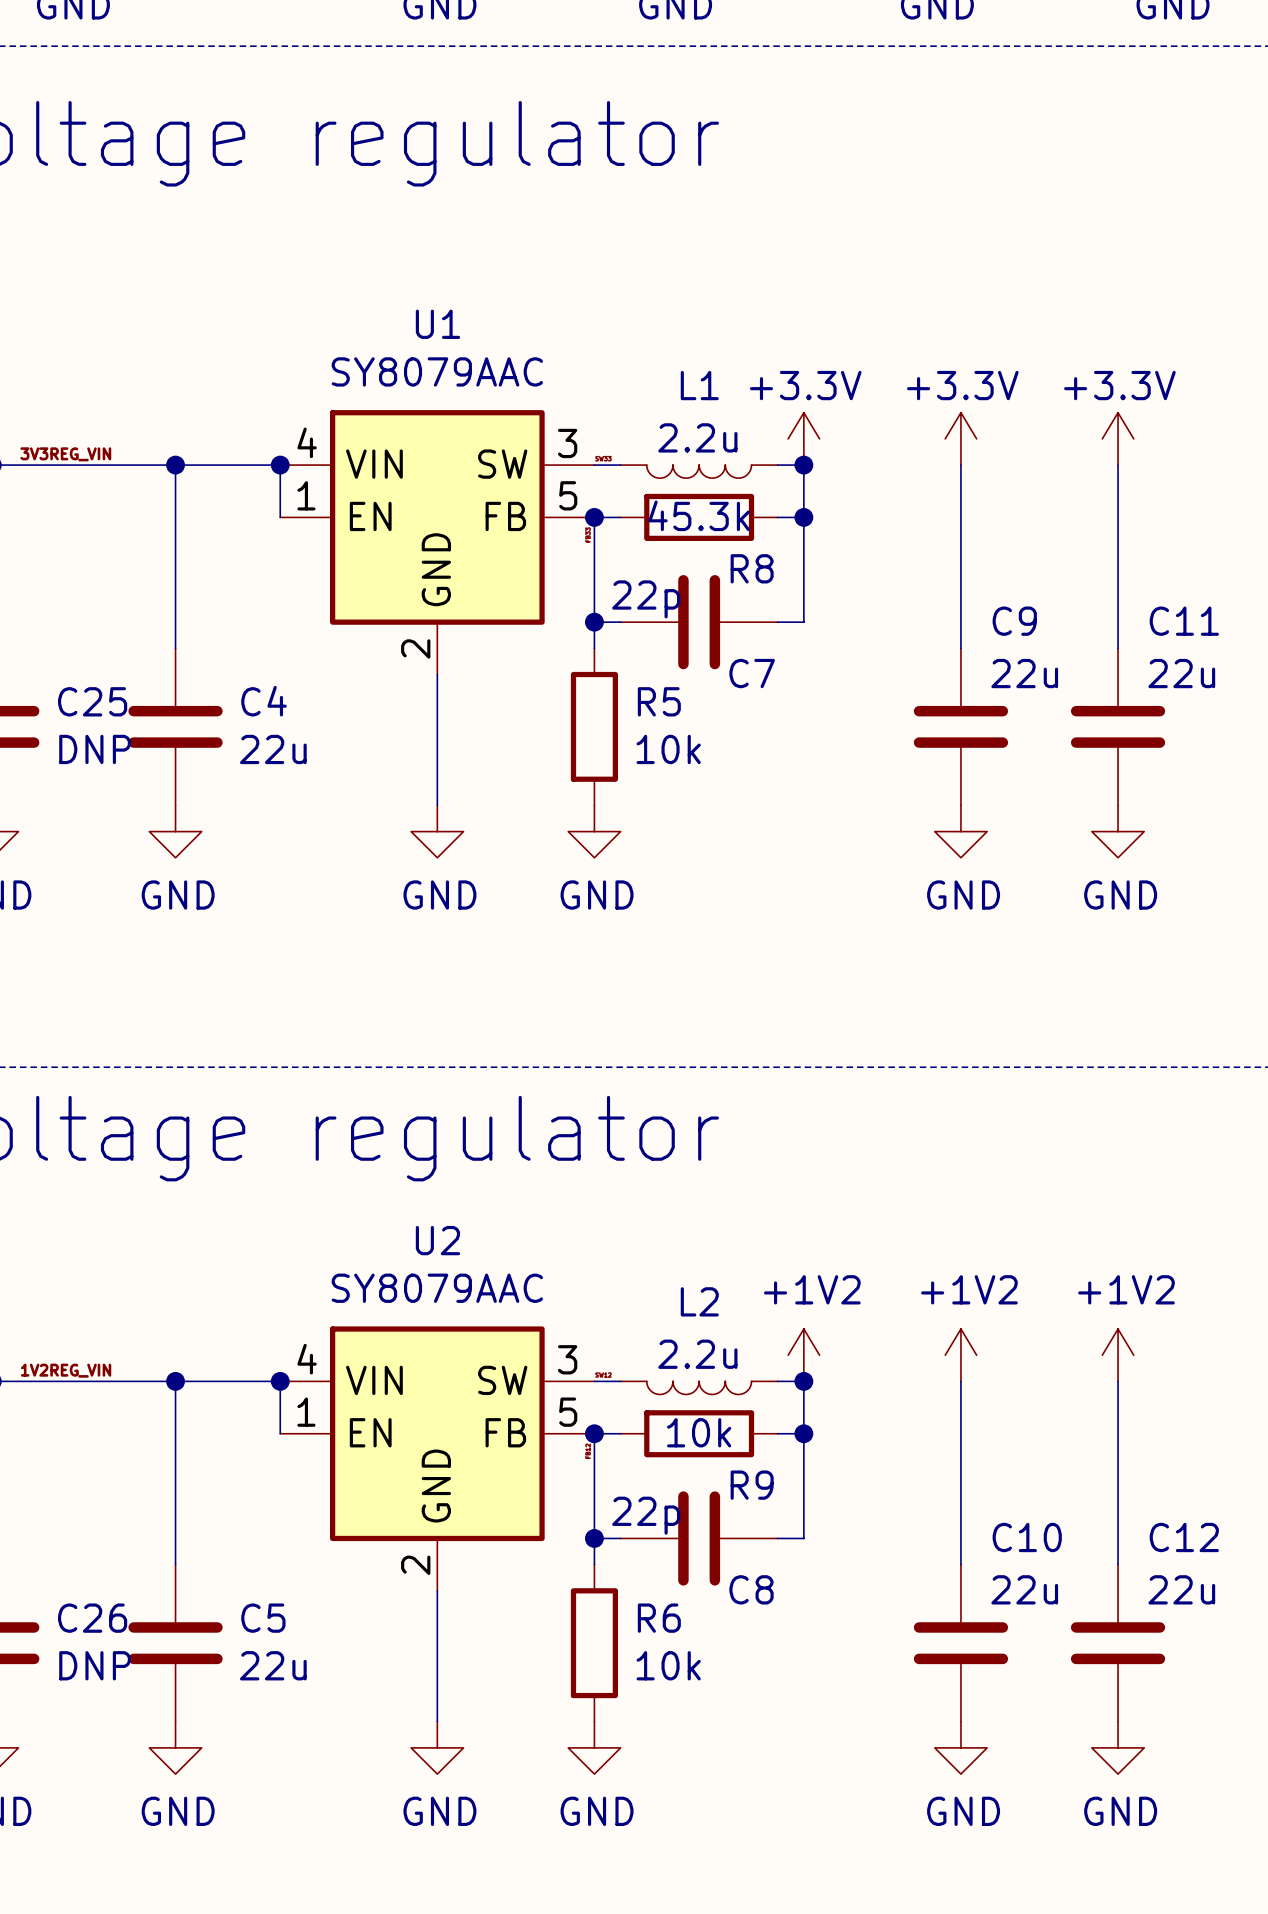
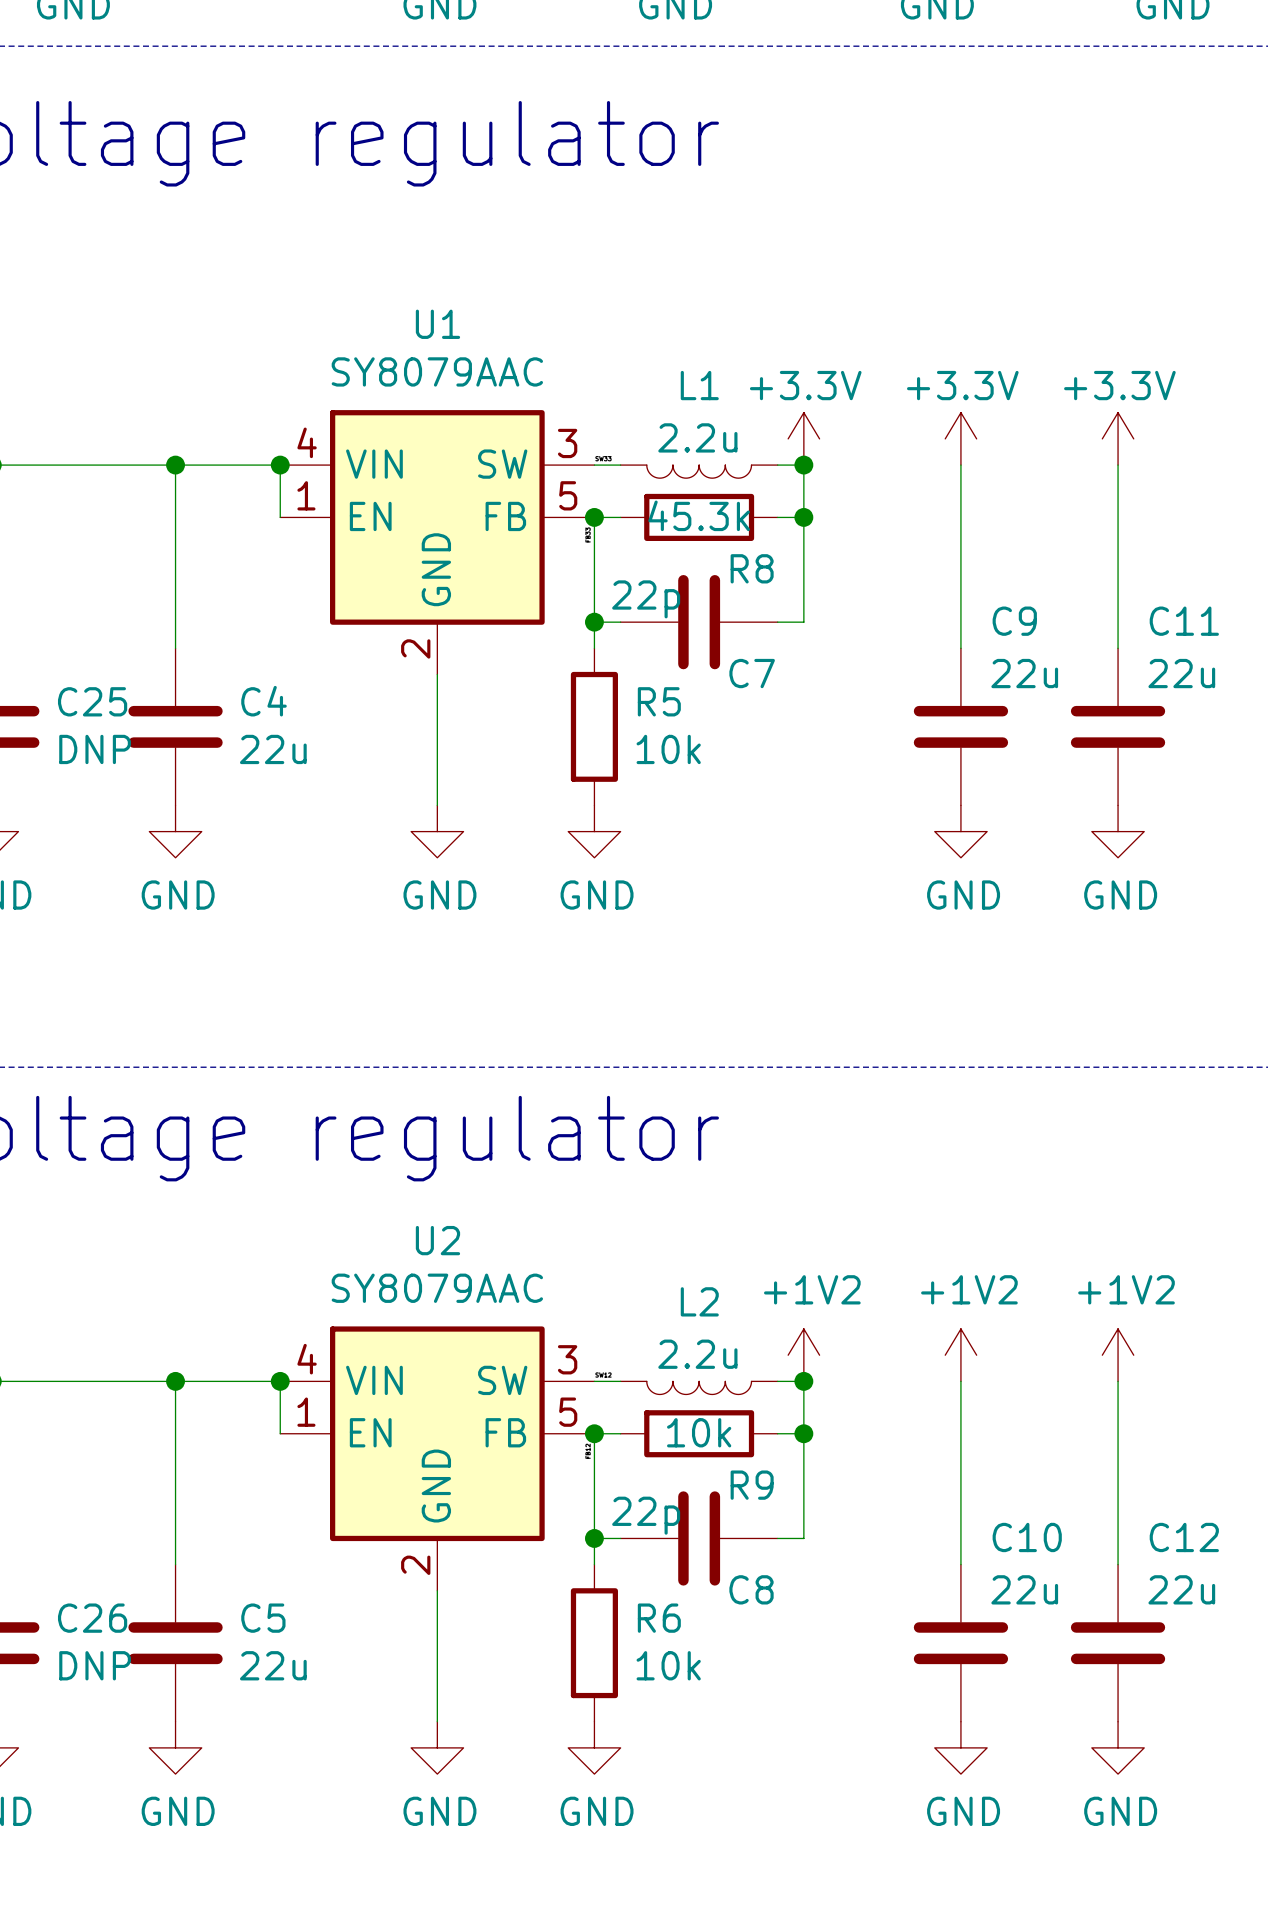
label: 3V3REG_VIN (65, 454) -> none
label: 1V2REG_VIN (66, 1370) -> none

